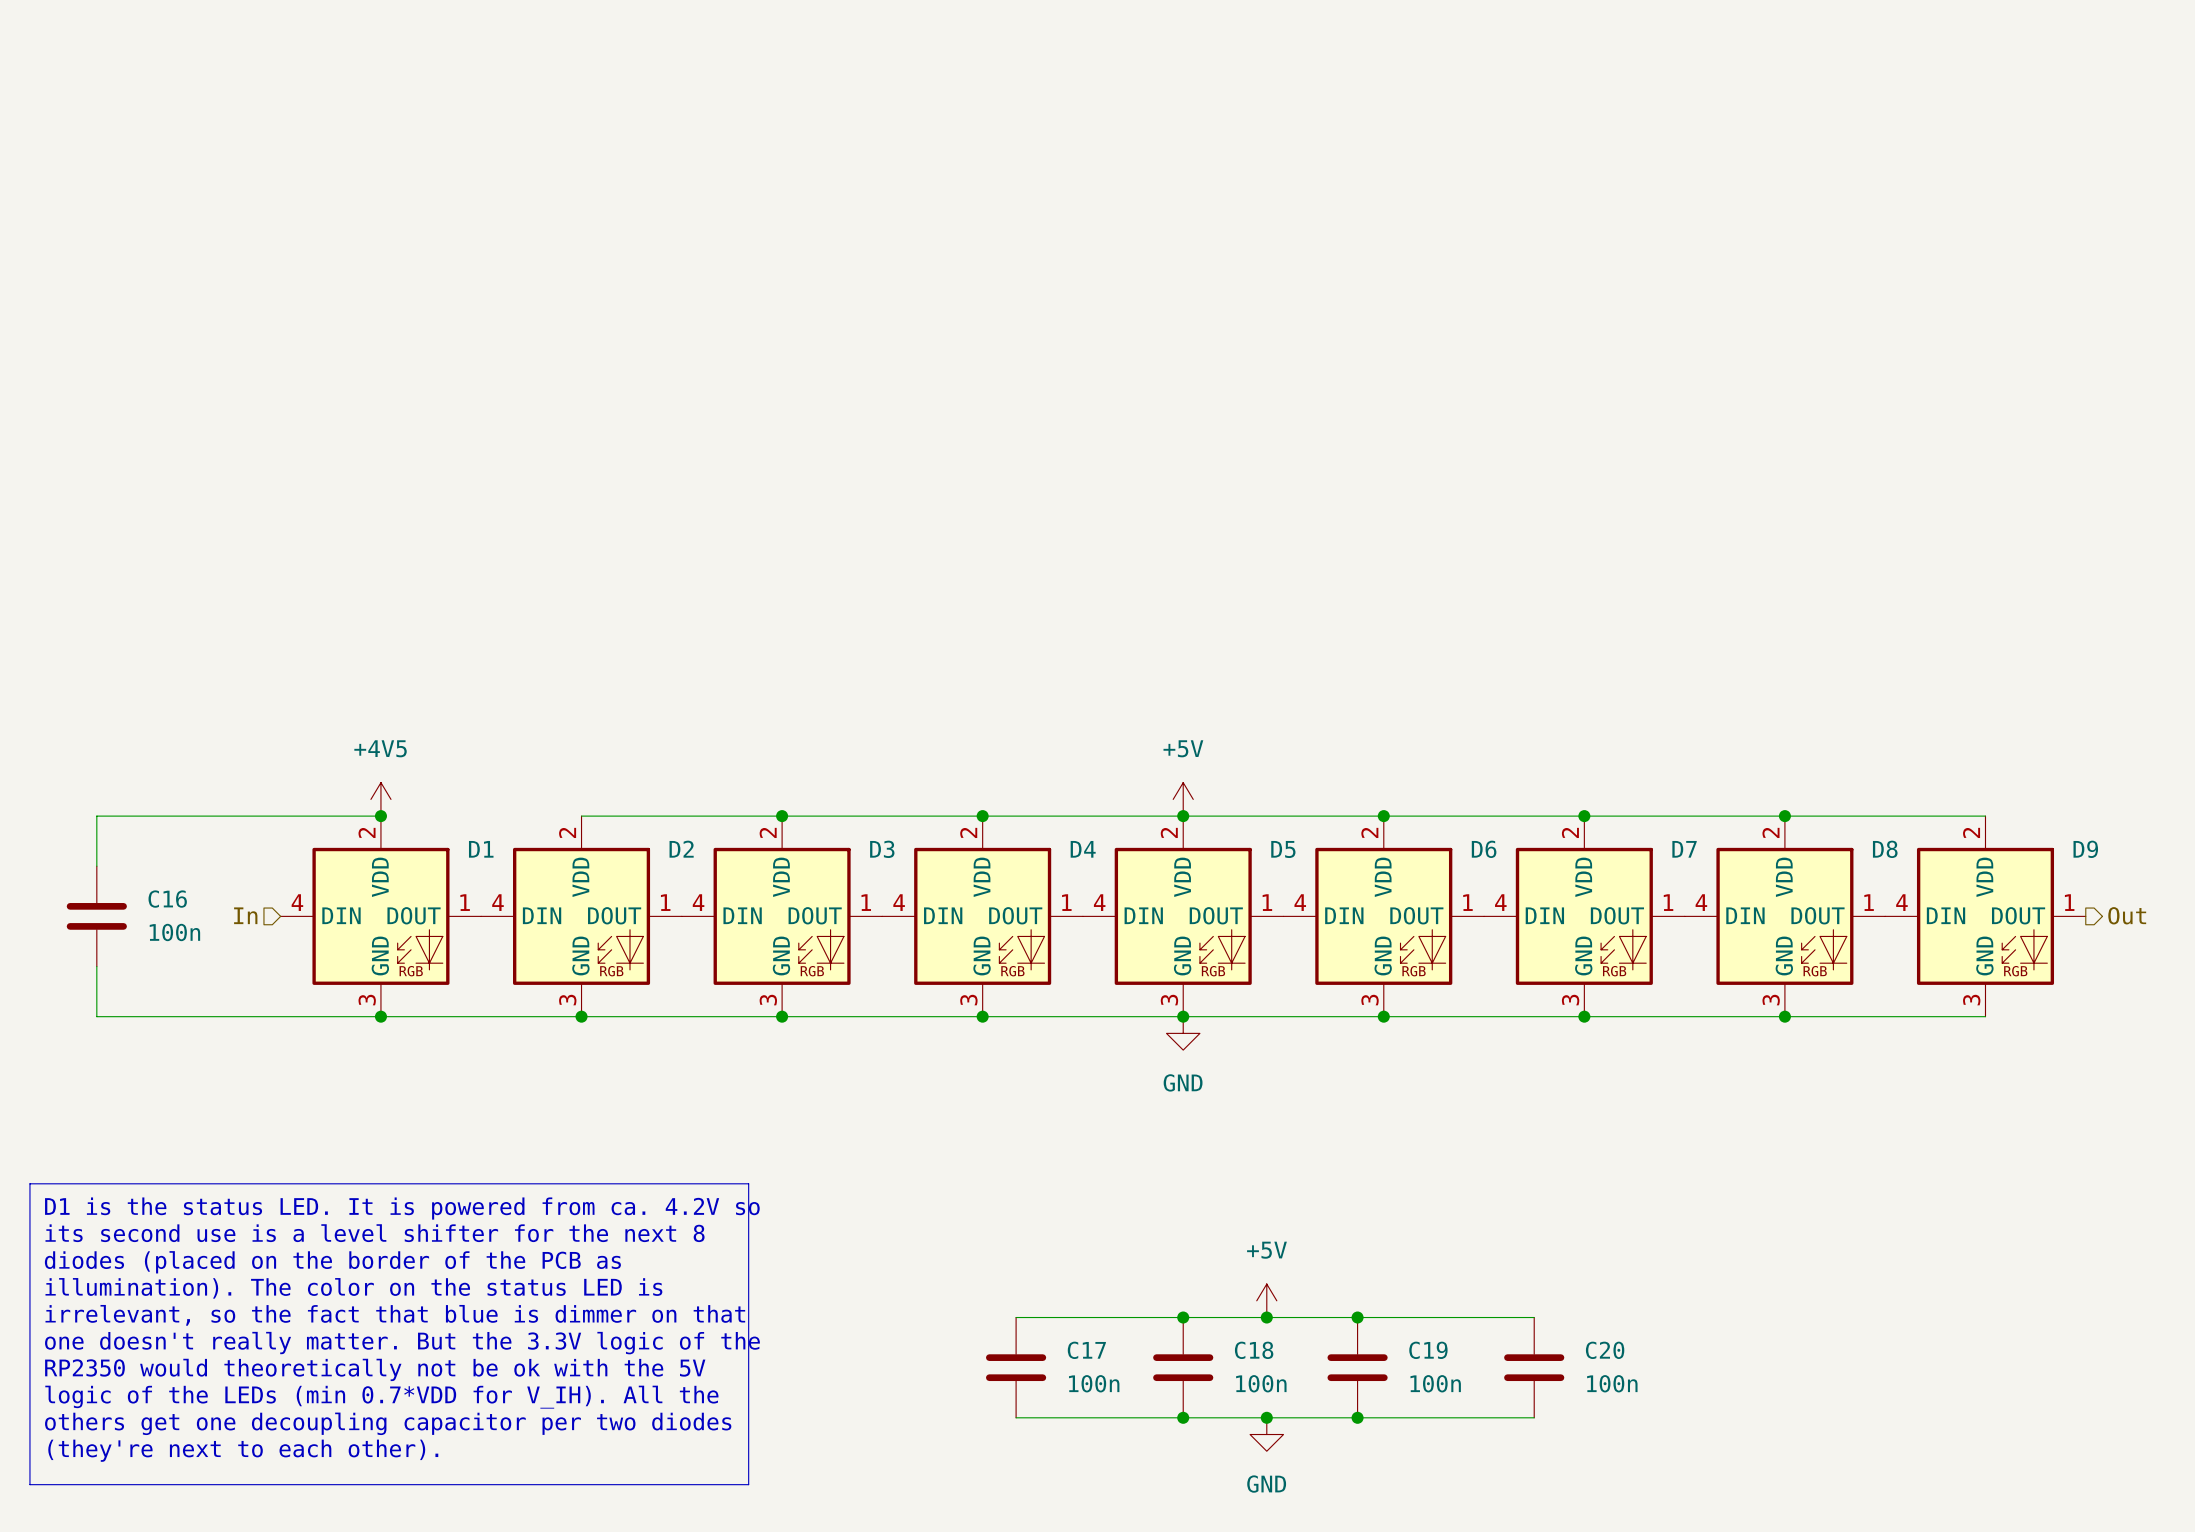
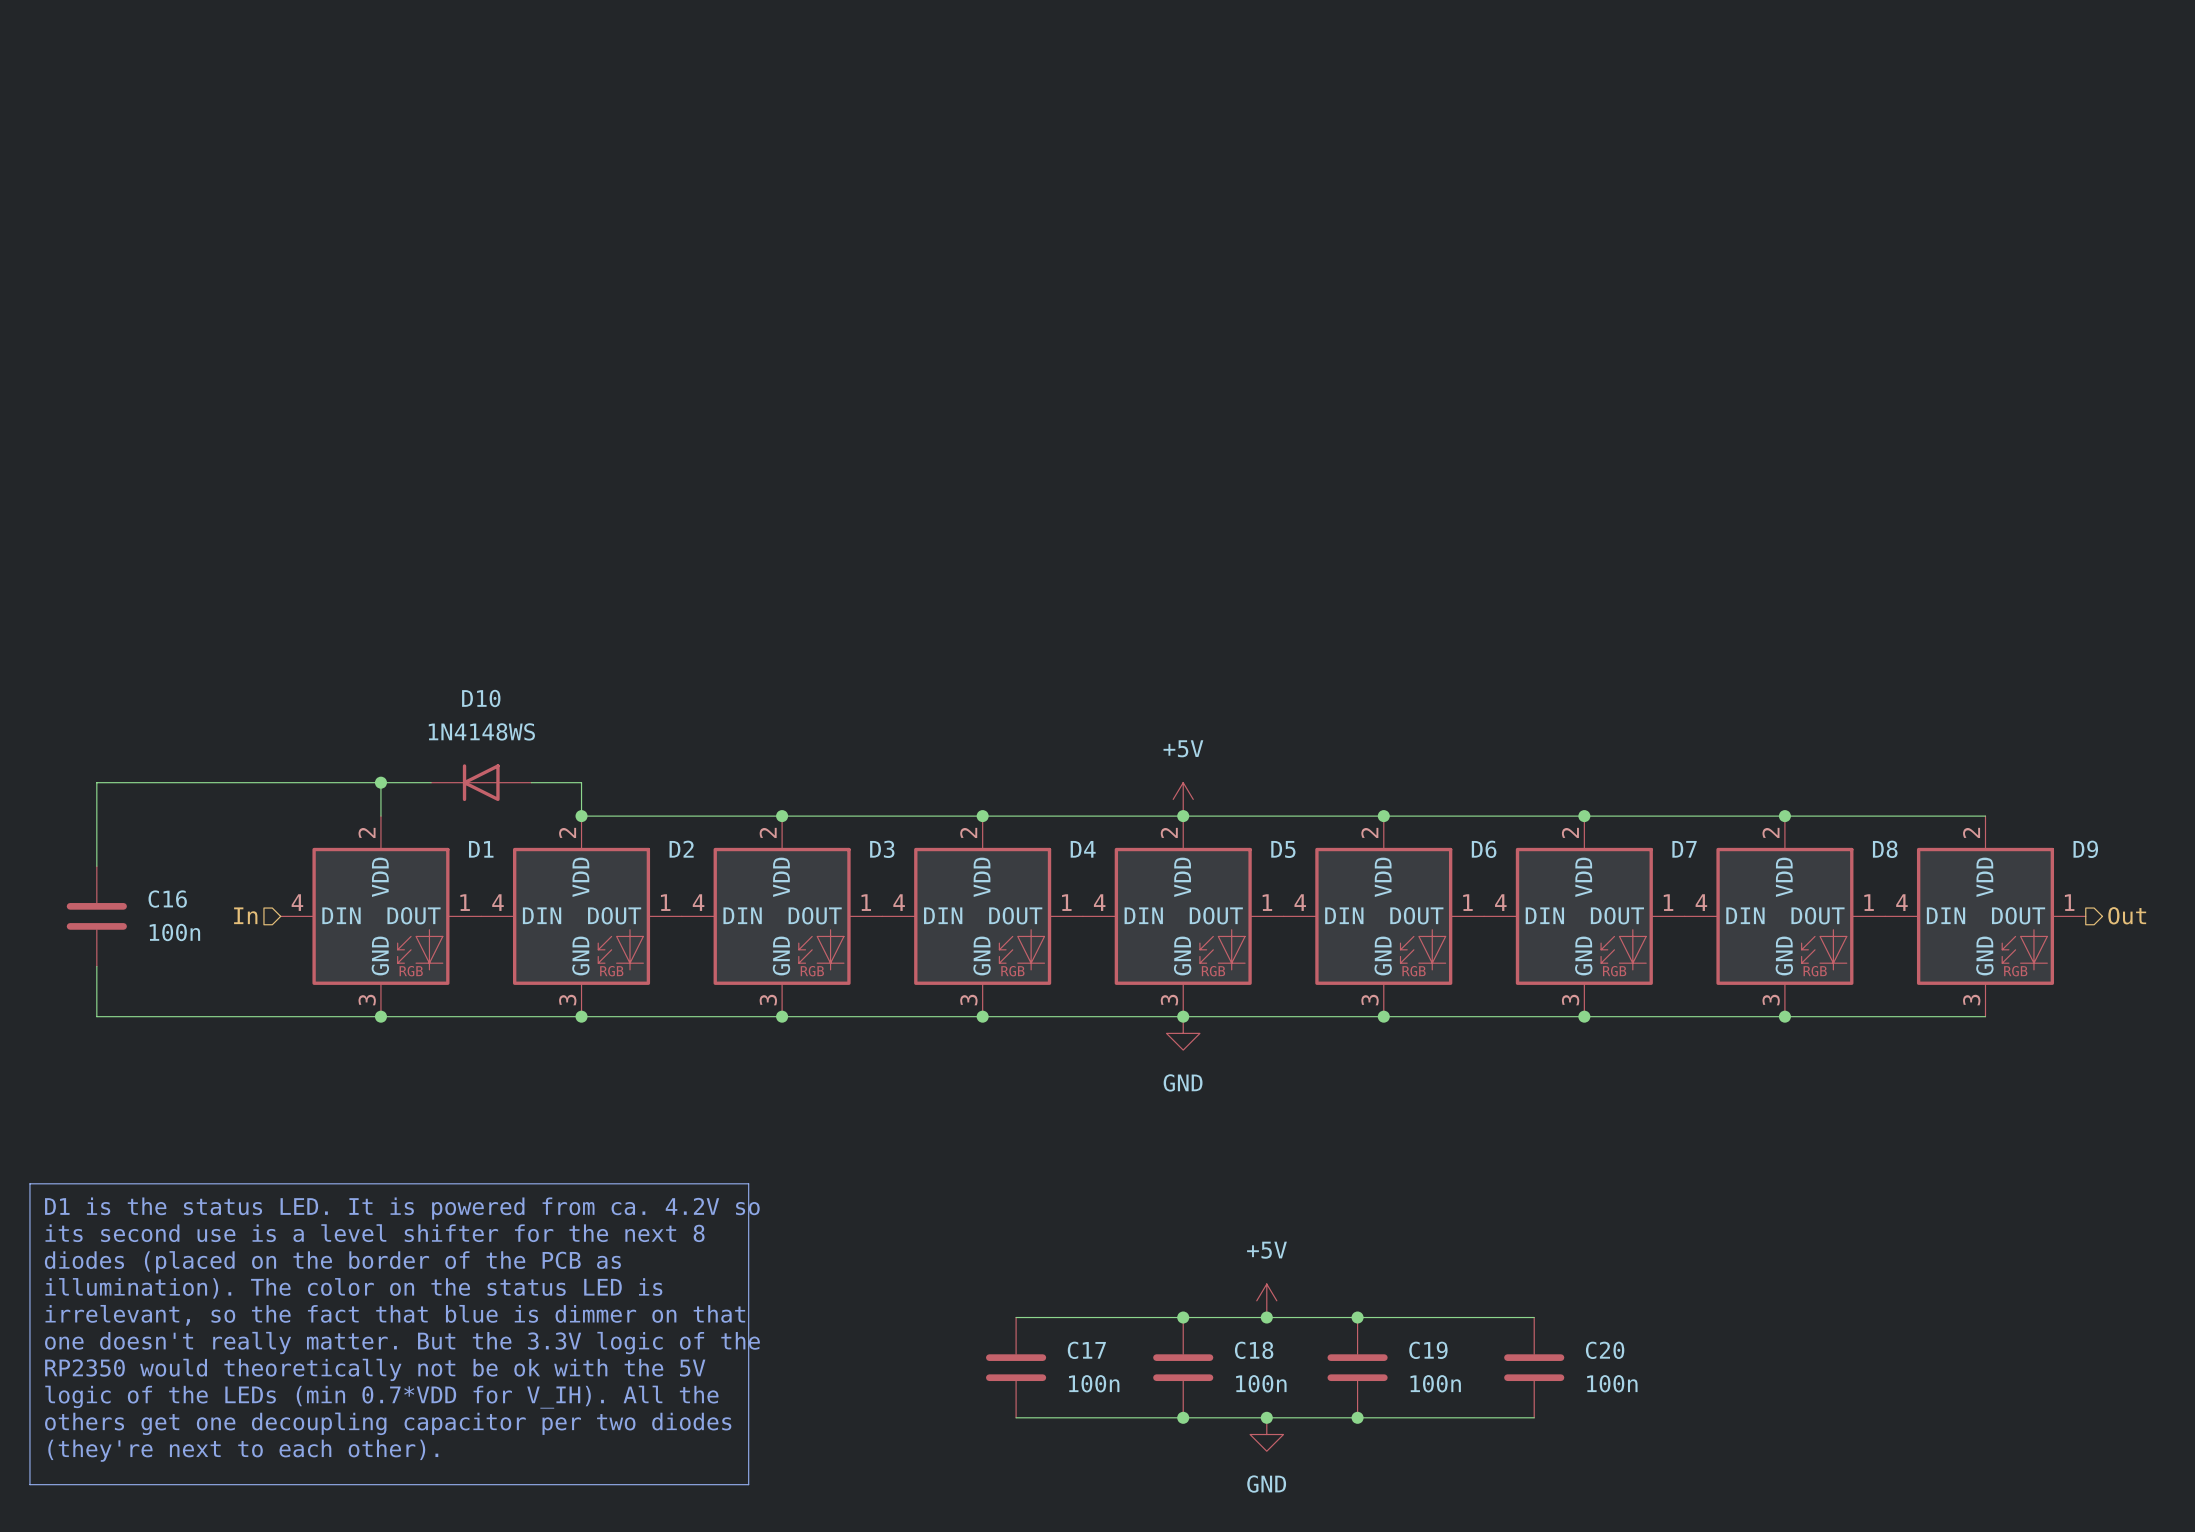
D10: none -> 1N4148WS (481, 782)
wire: none -> (531, 782) (581, 782) (581, 816)
power symbol: +4V5 (380, 799) -> none
wire: (96, 816) (380, 816) -> (96, 816) (96, 782) (431, 782)
junction position: (380, 816) -> (380, 782)
junction: none -> (581, 816)

